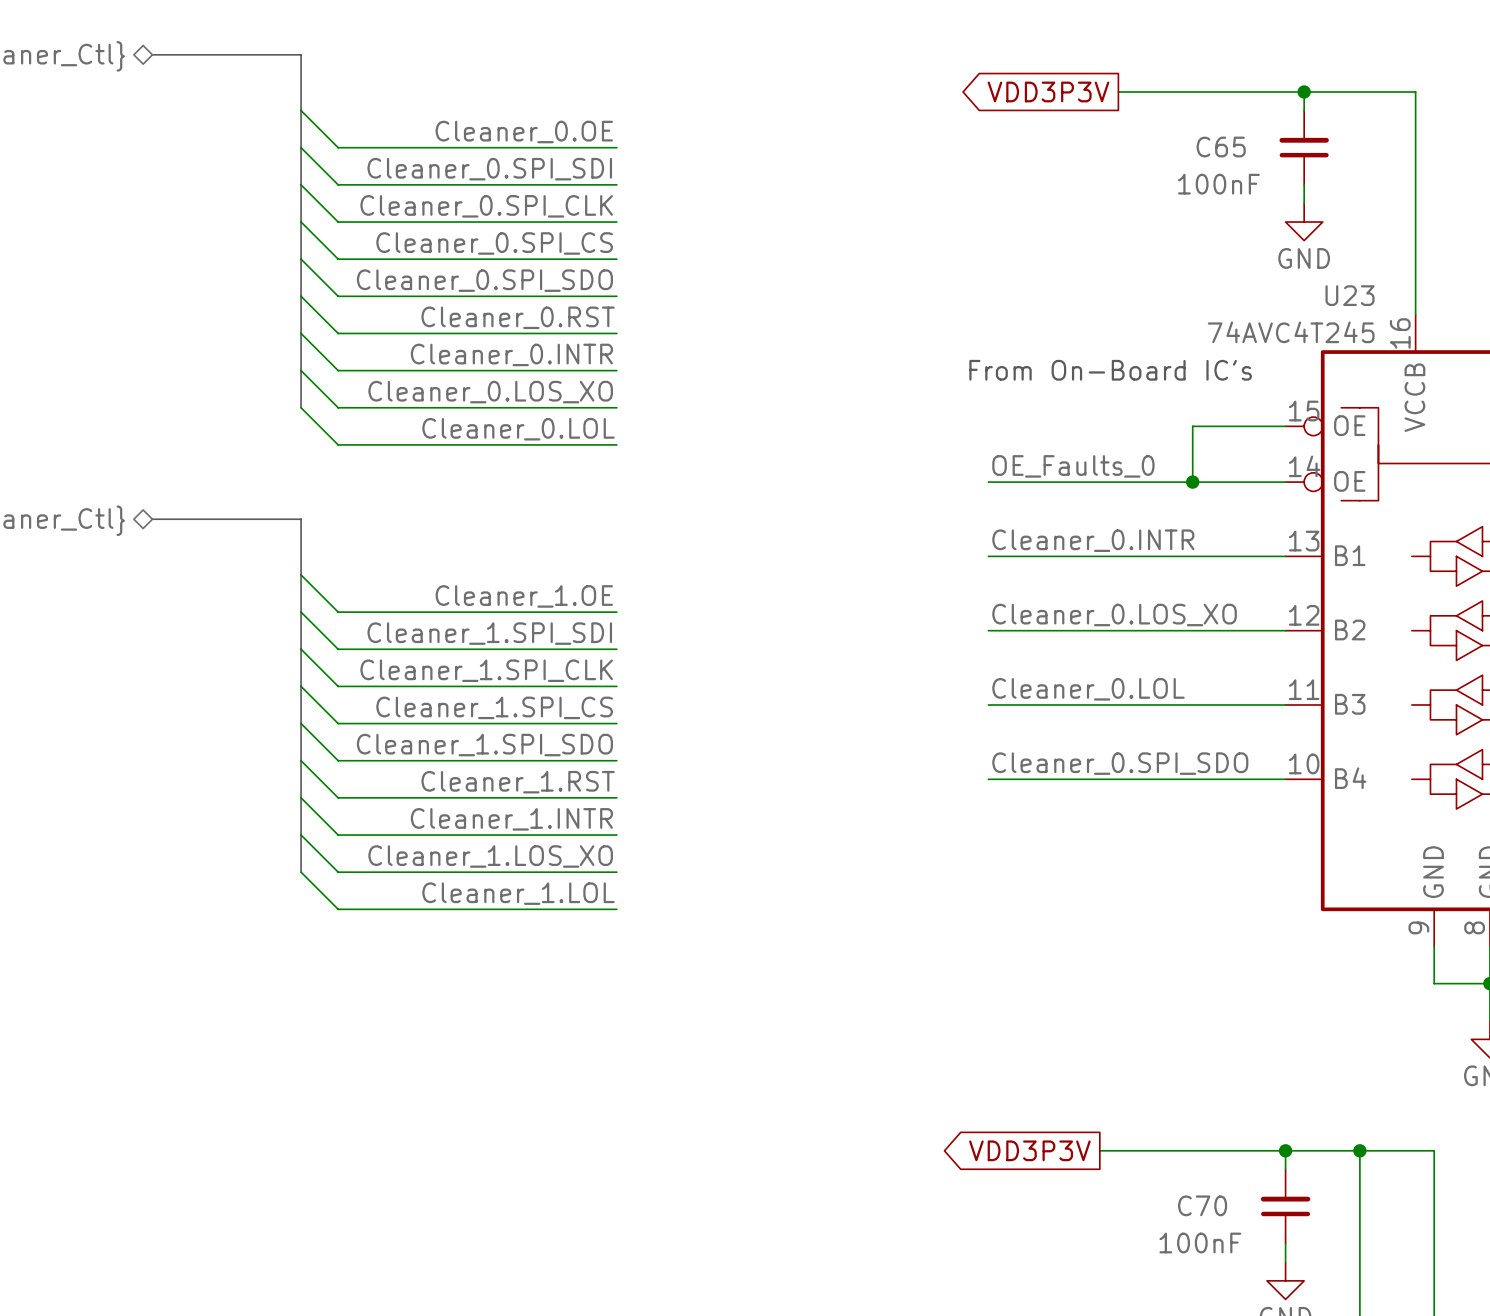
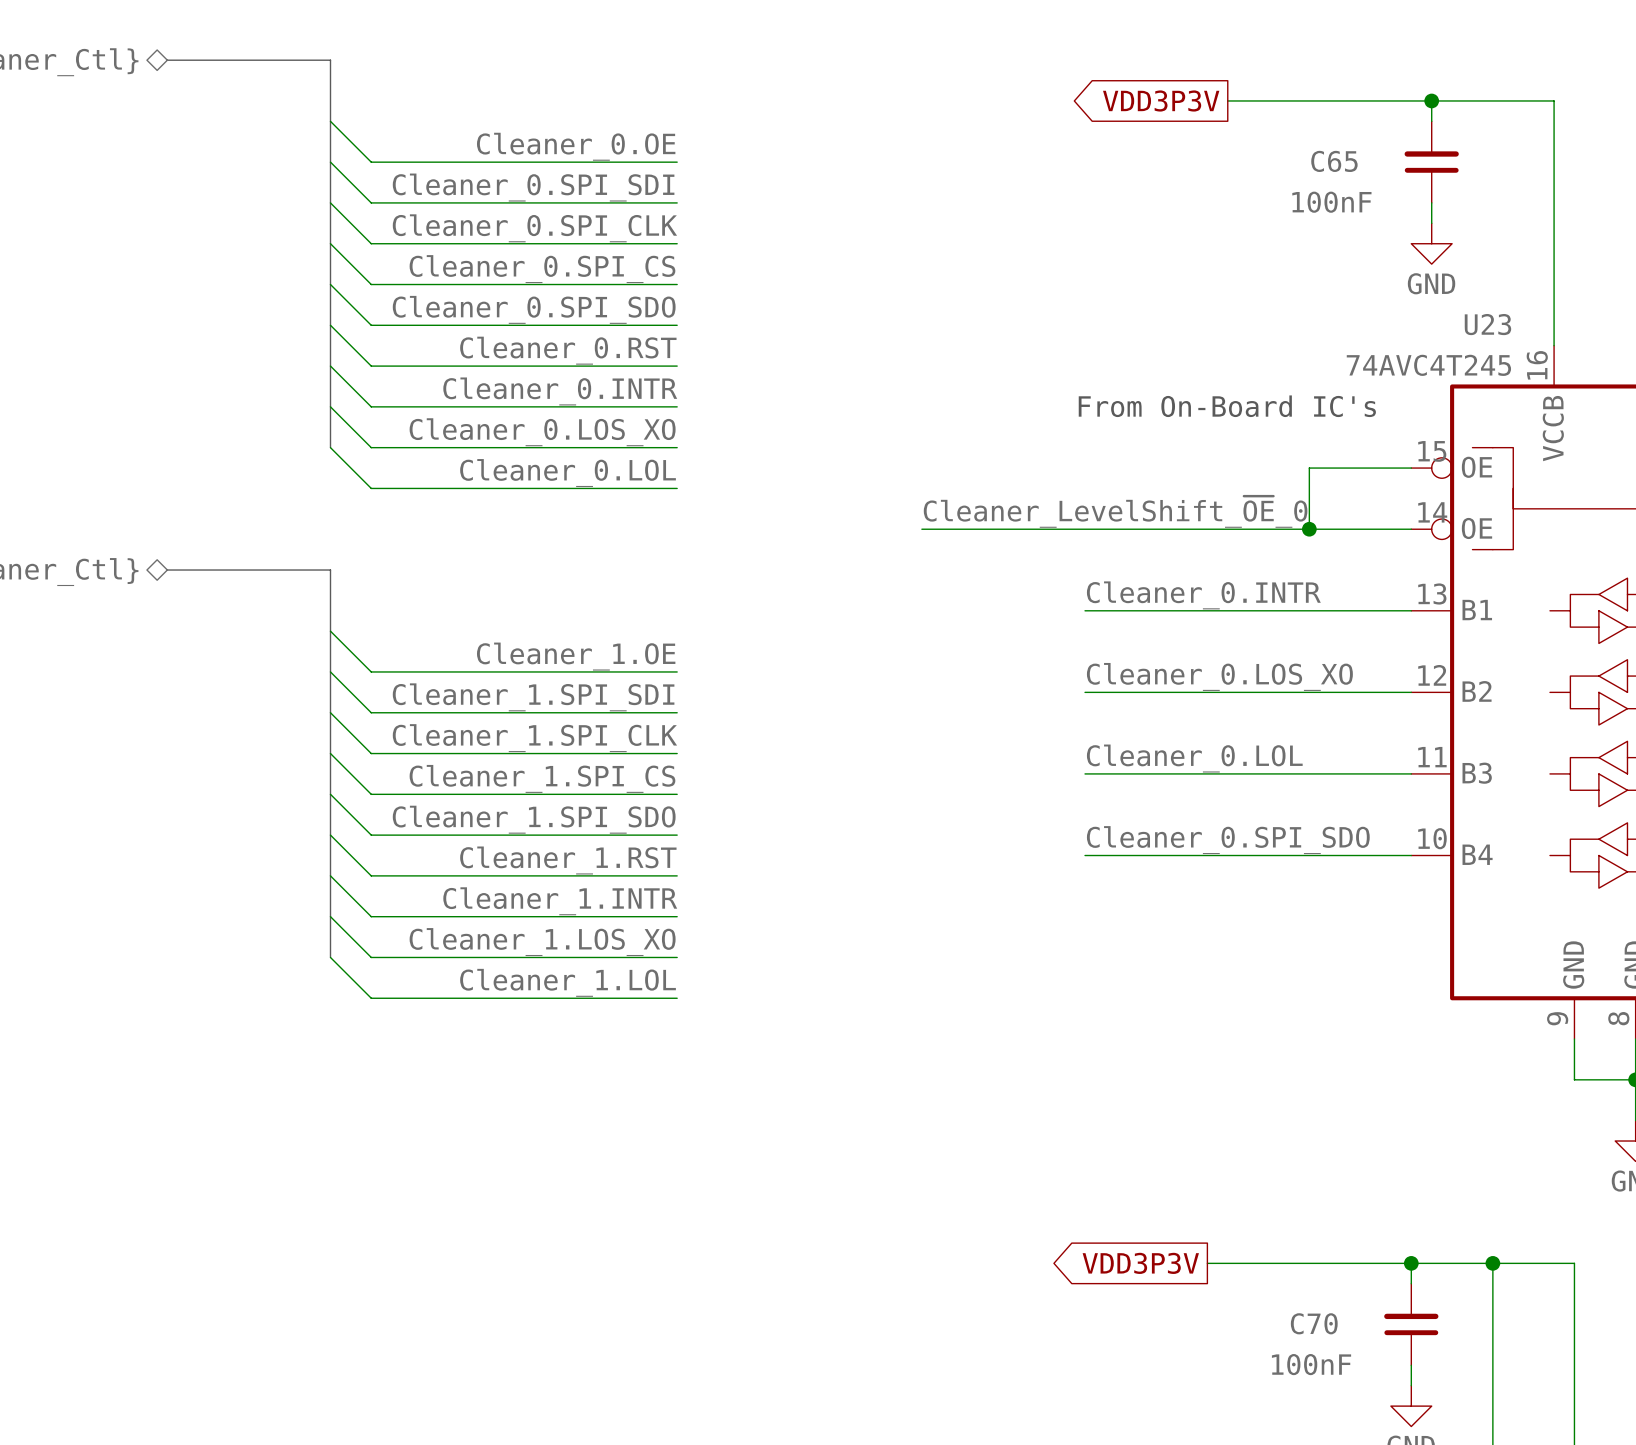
label: none -> Cleaner_LevelShift_~{OE}_0 (1115, 511)
label: OE_Faults_0 (1073, 466) -> none
wire: none -> (921, 529) (1085, 529)

